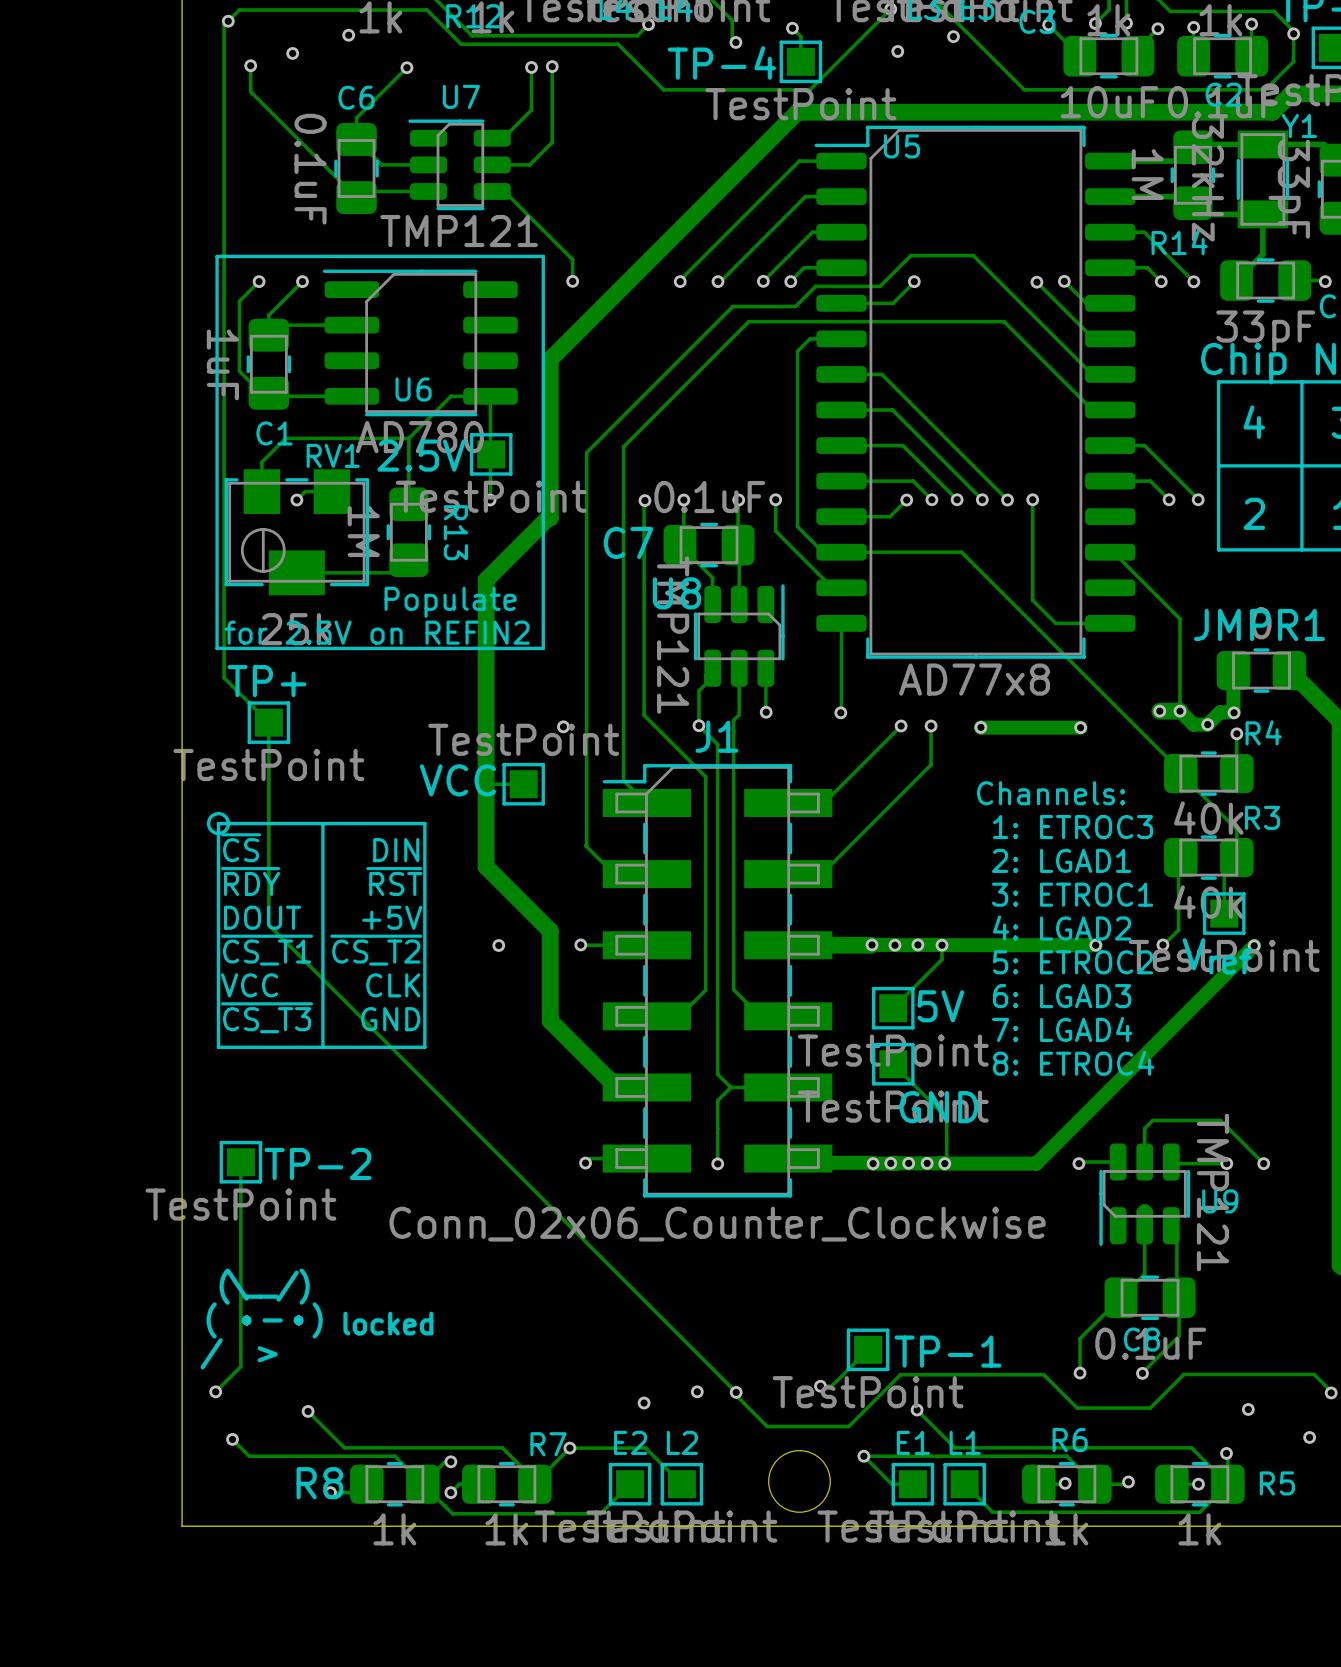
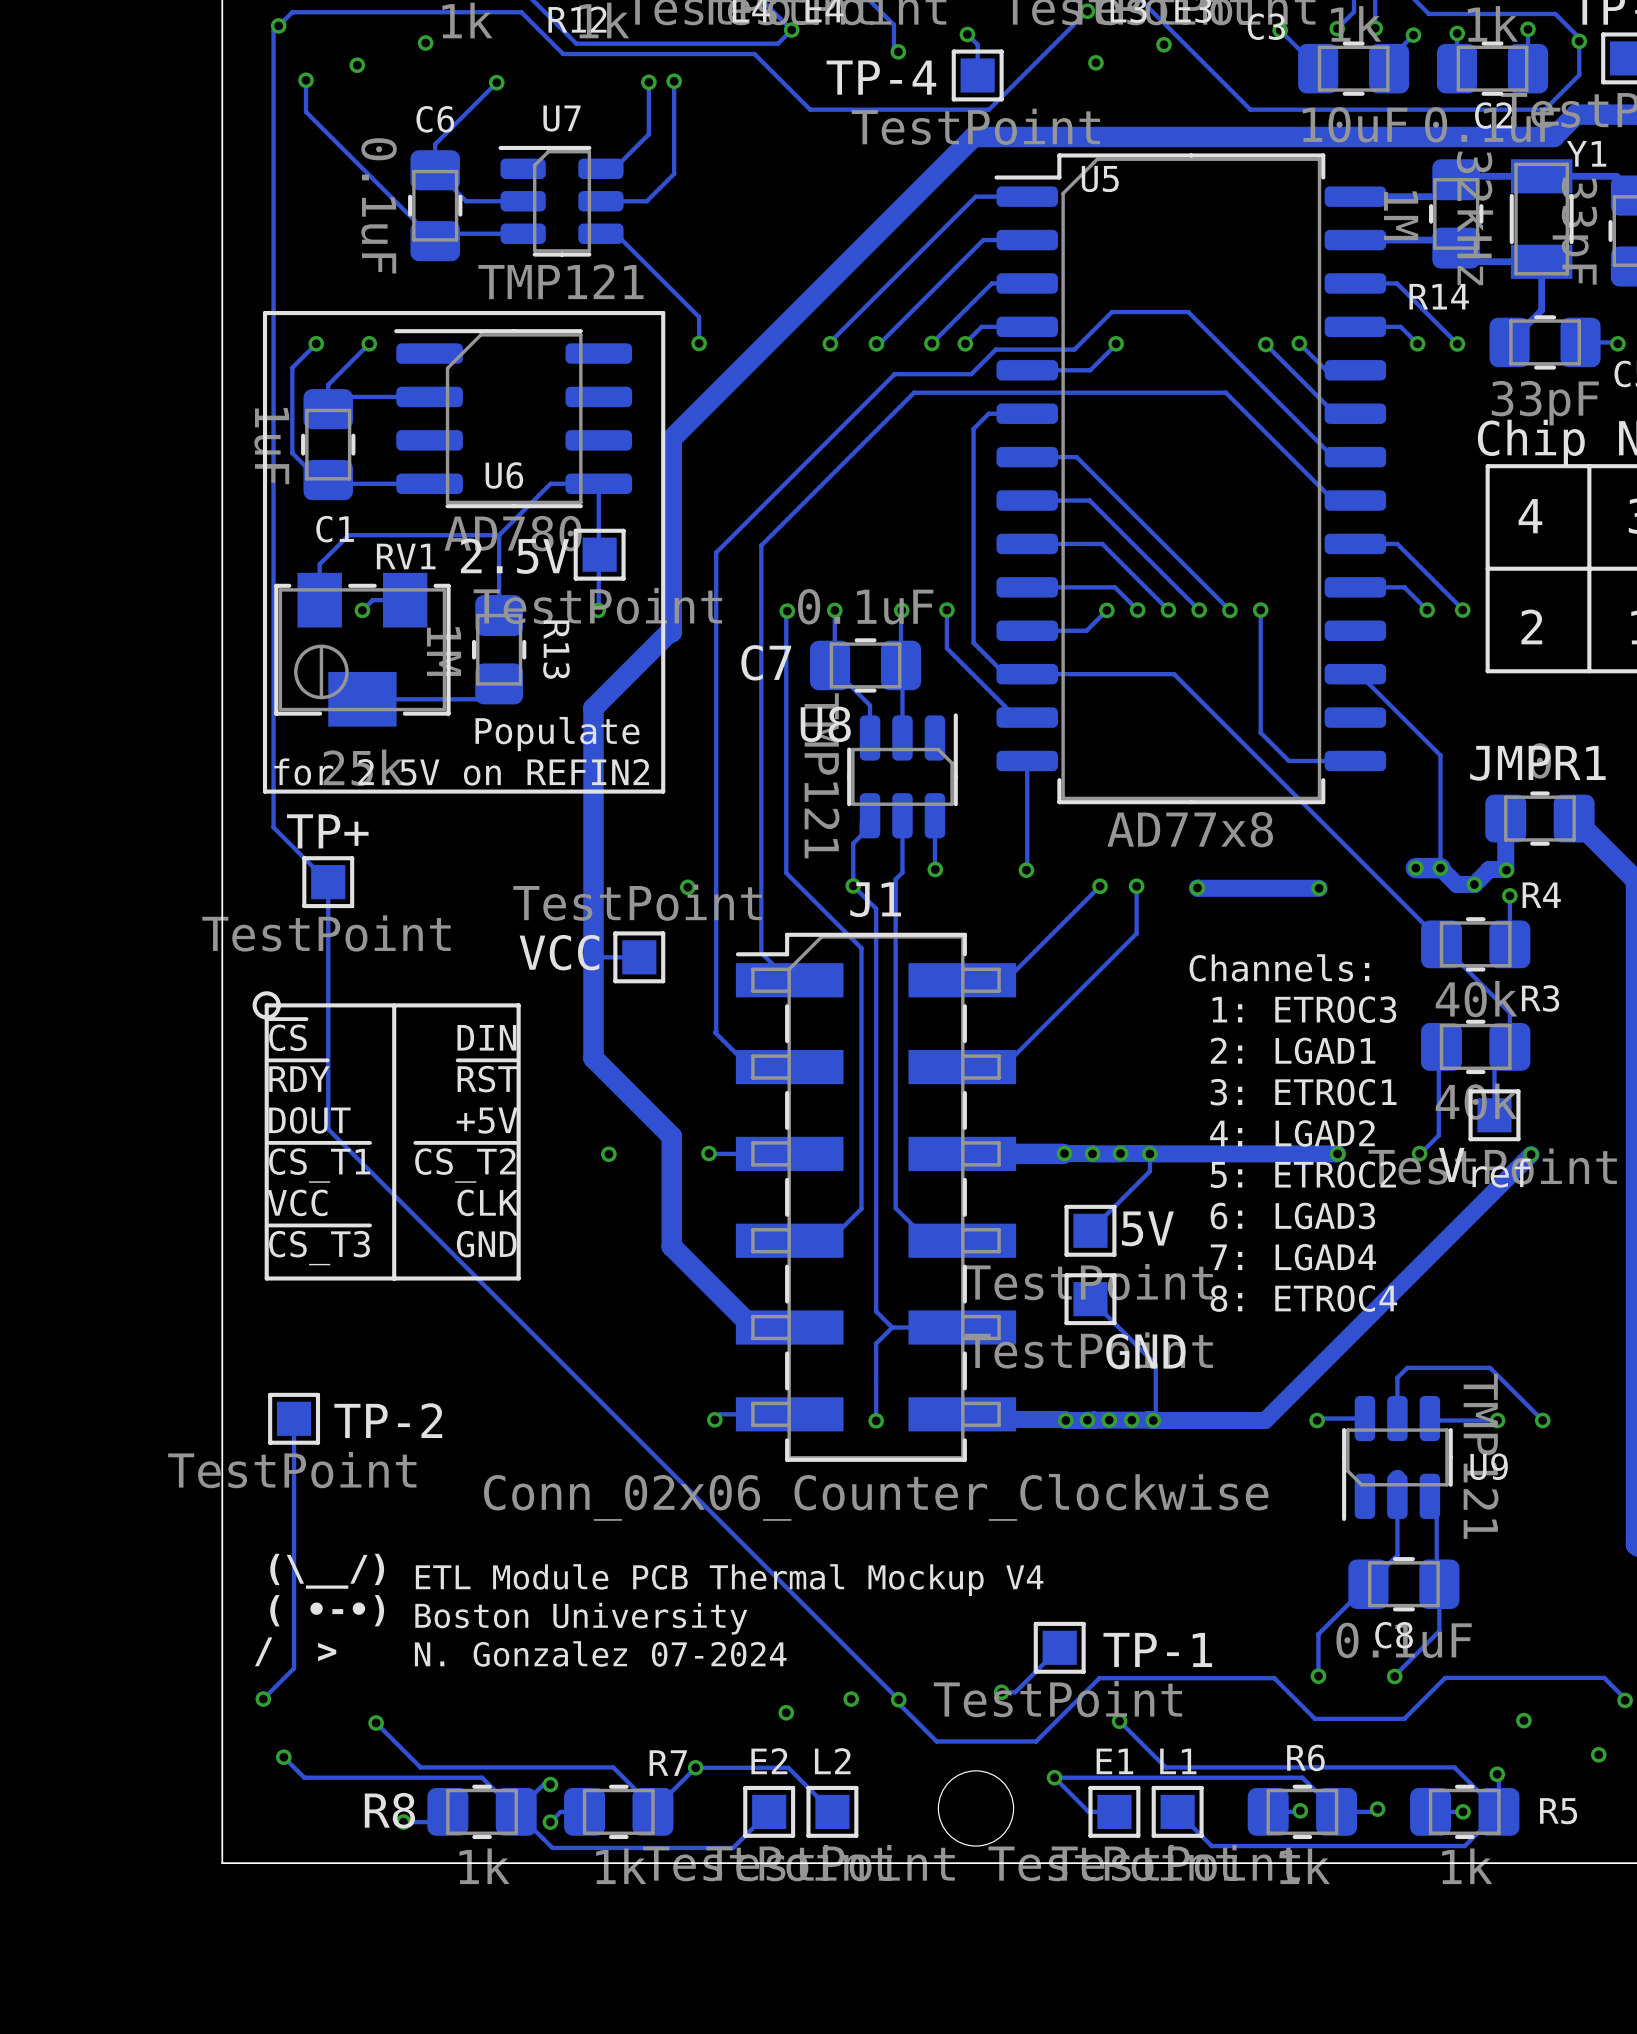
text: none -> ETL Module PCB Thermal Mockup V4 (729, 1580)
text: locked (388, 1323) -> Boston University (581, 1618)
text: none -> N. Gonzalez 07-2024 (600, 1653)

